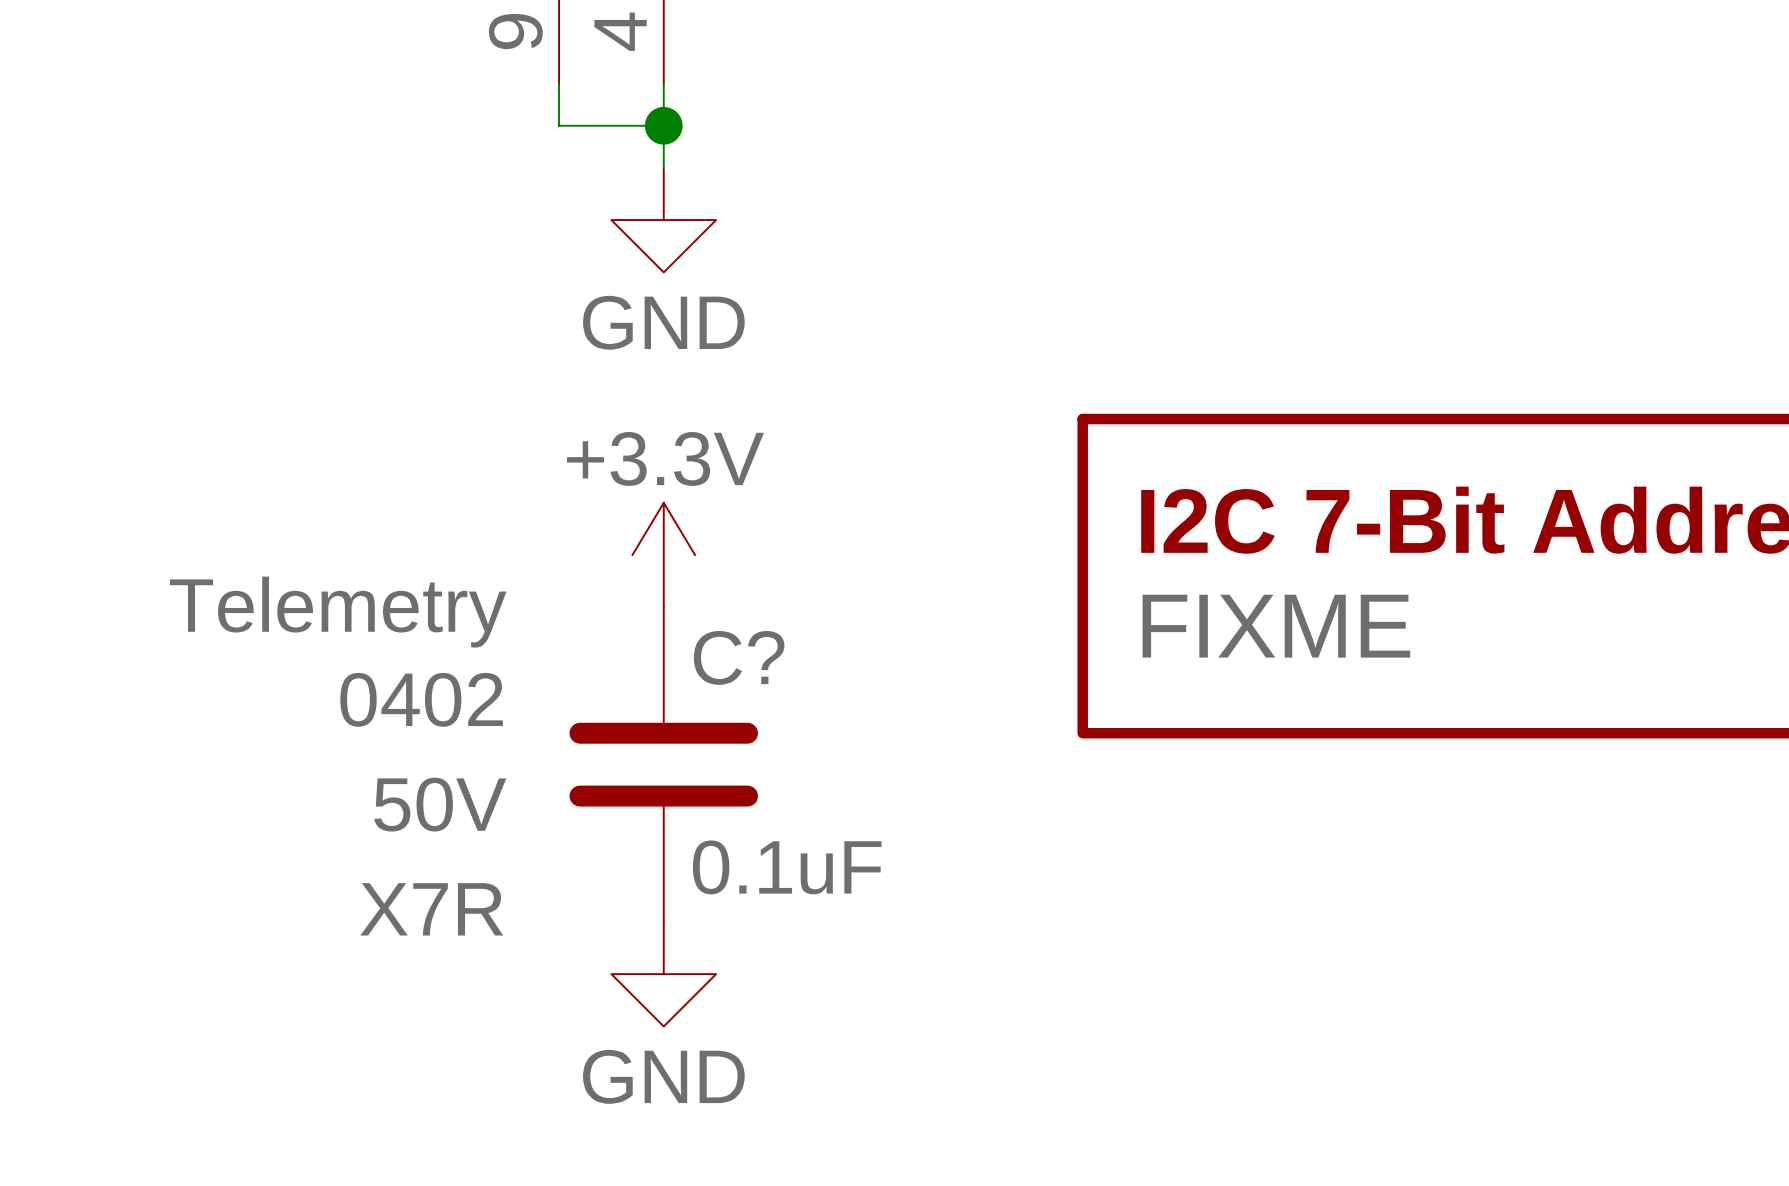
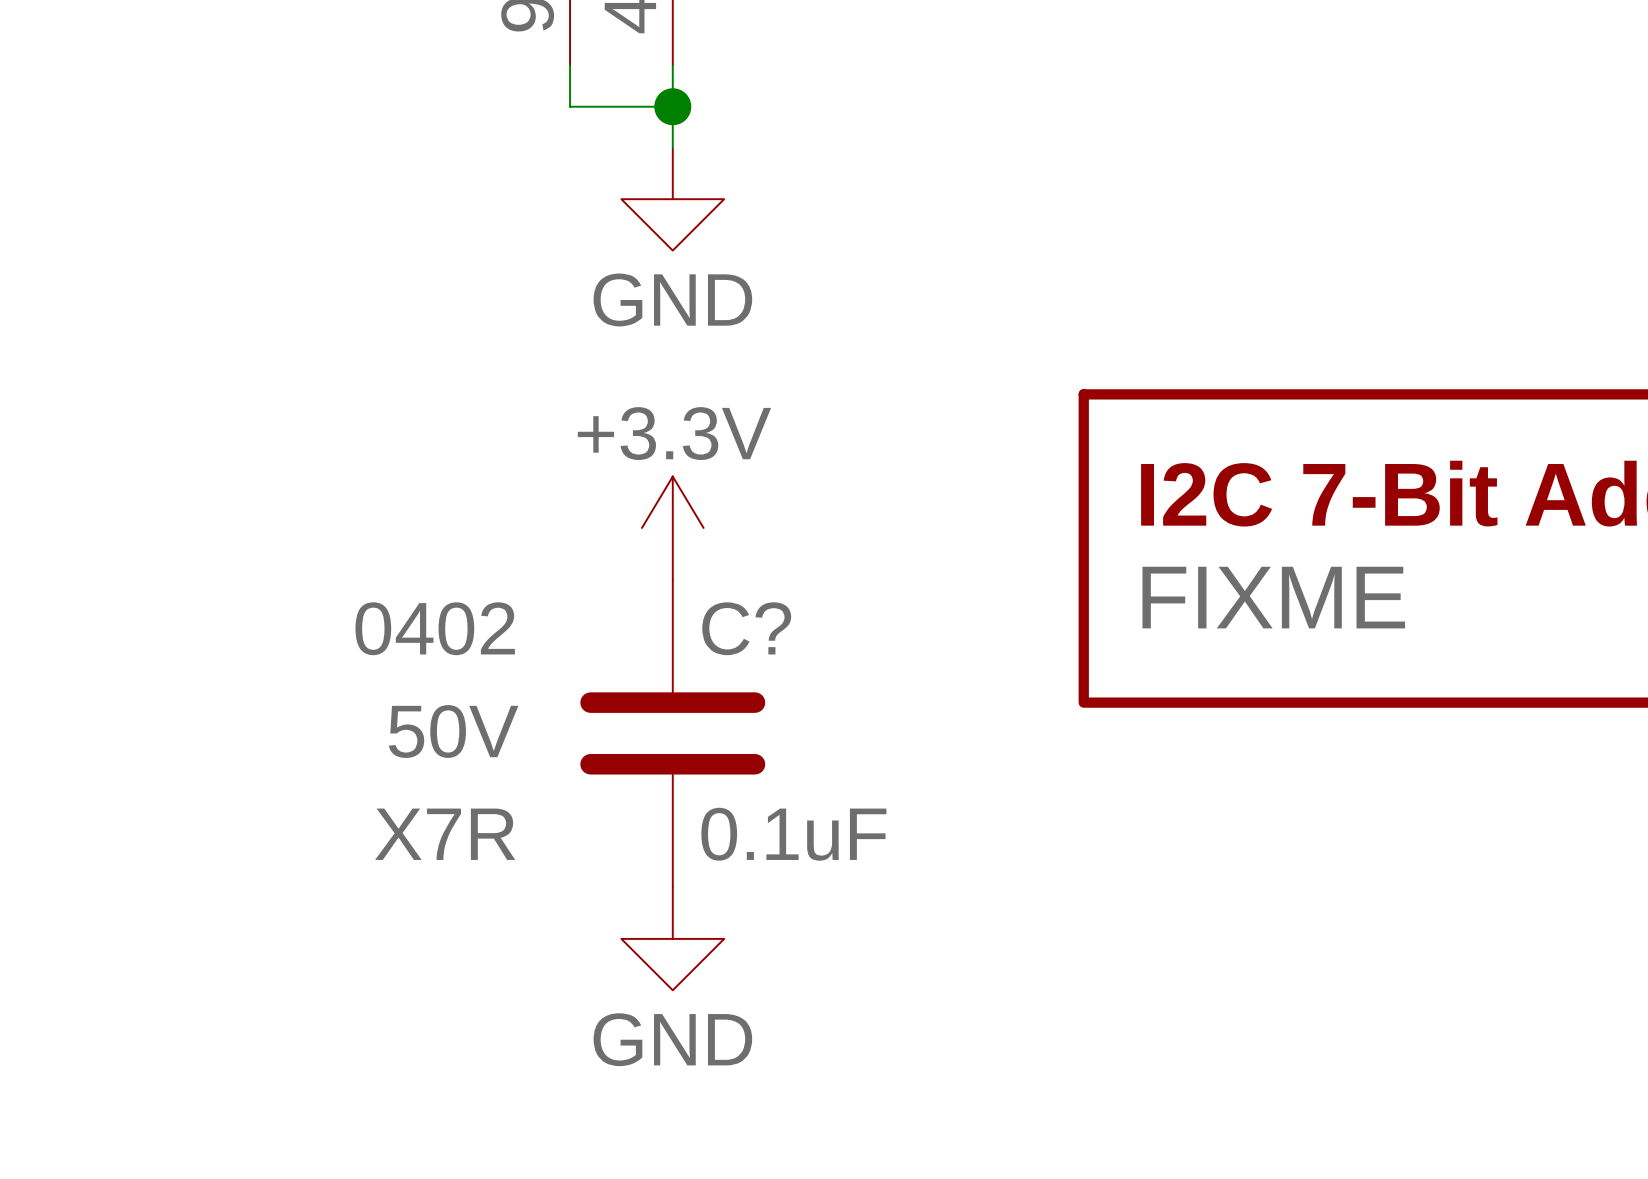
C? text: Telemetry (338, 612) -> none
C? text position: 0402 (421, 699) -> 0402 (435, 628)
C? text position: 50V (440, 804) -> 50V (453, 731)
C? text position: X7R (431, 909) -> X7R (445, 834)

